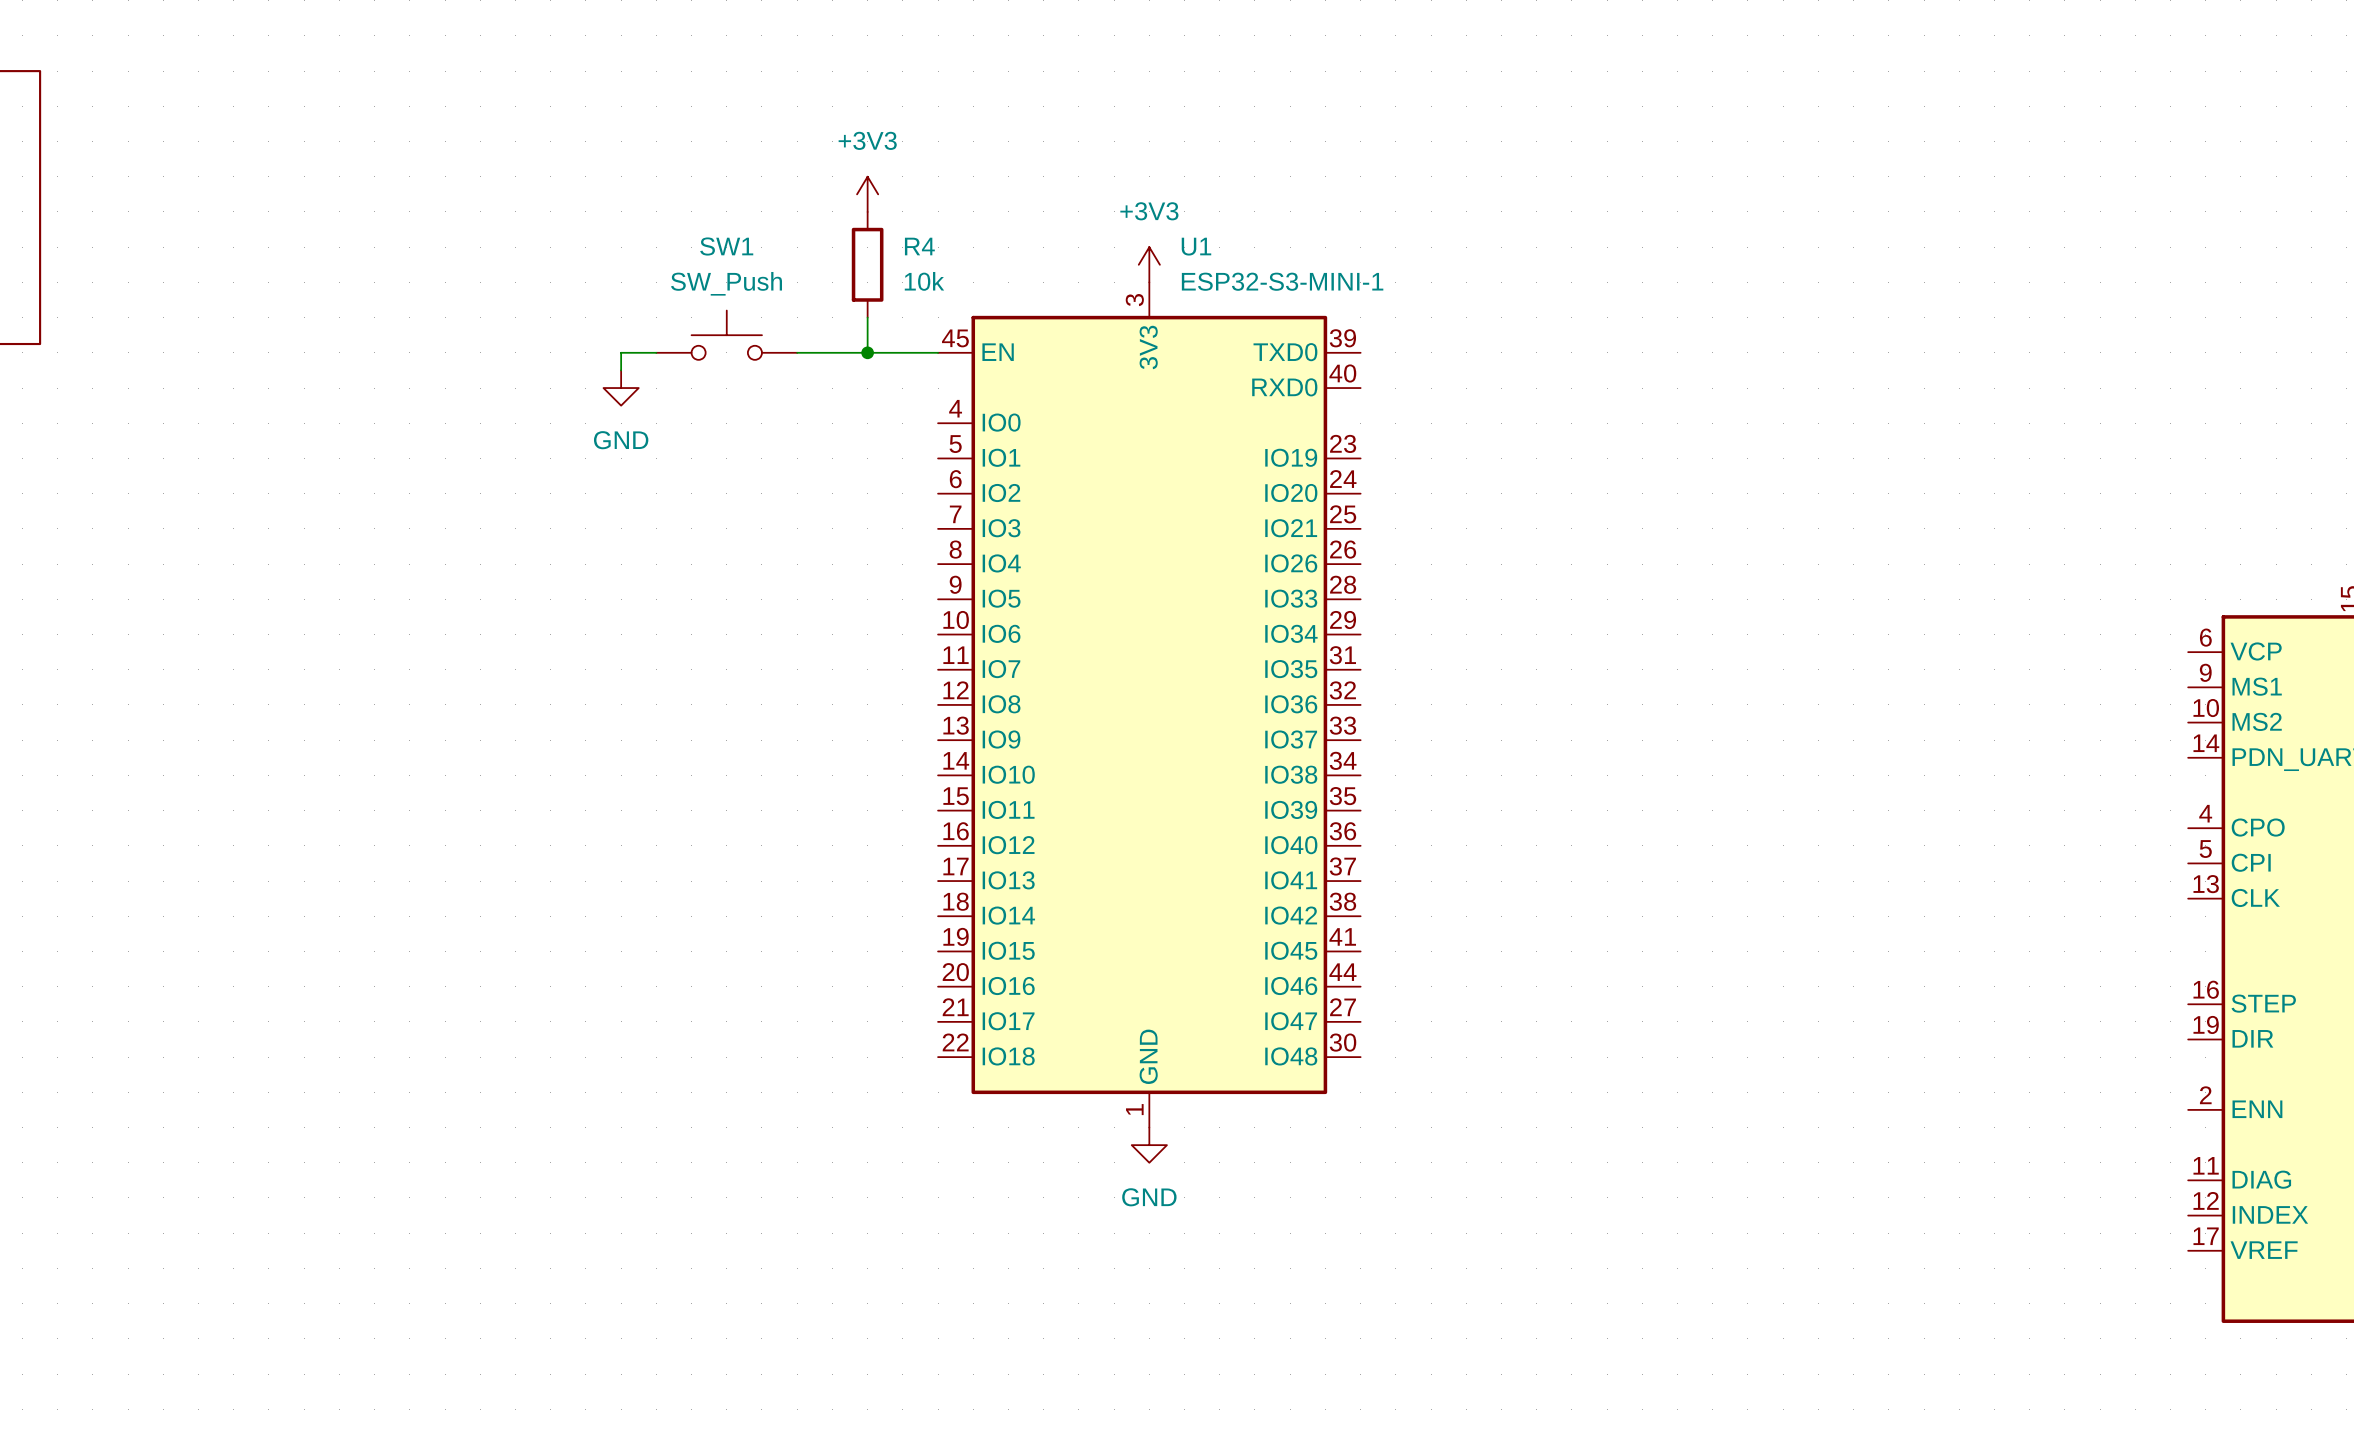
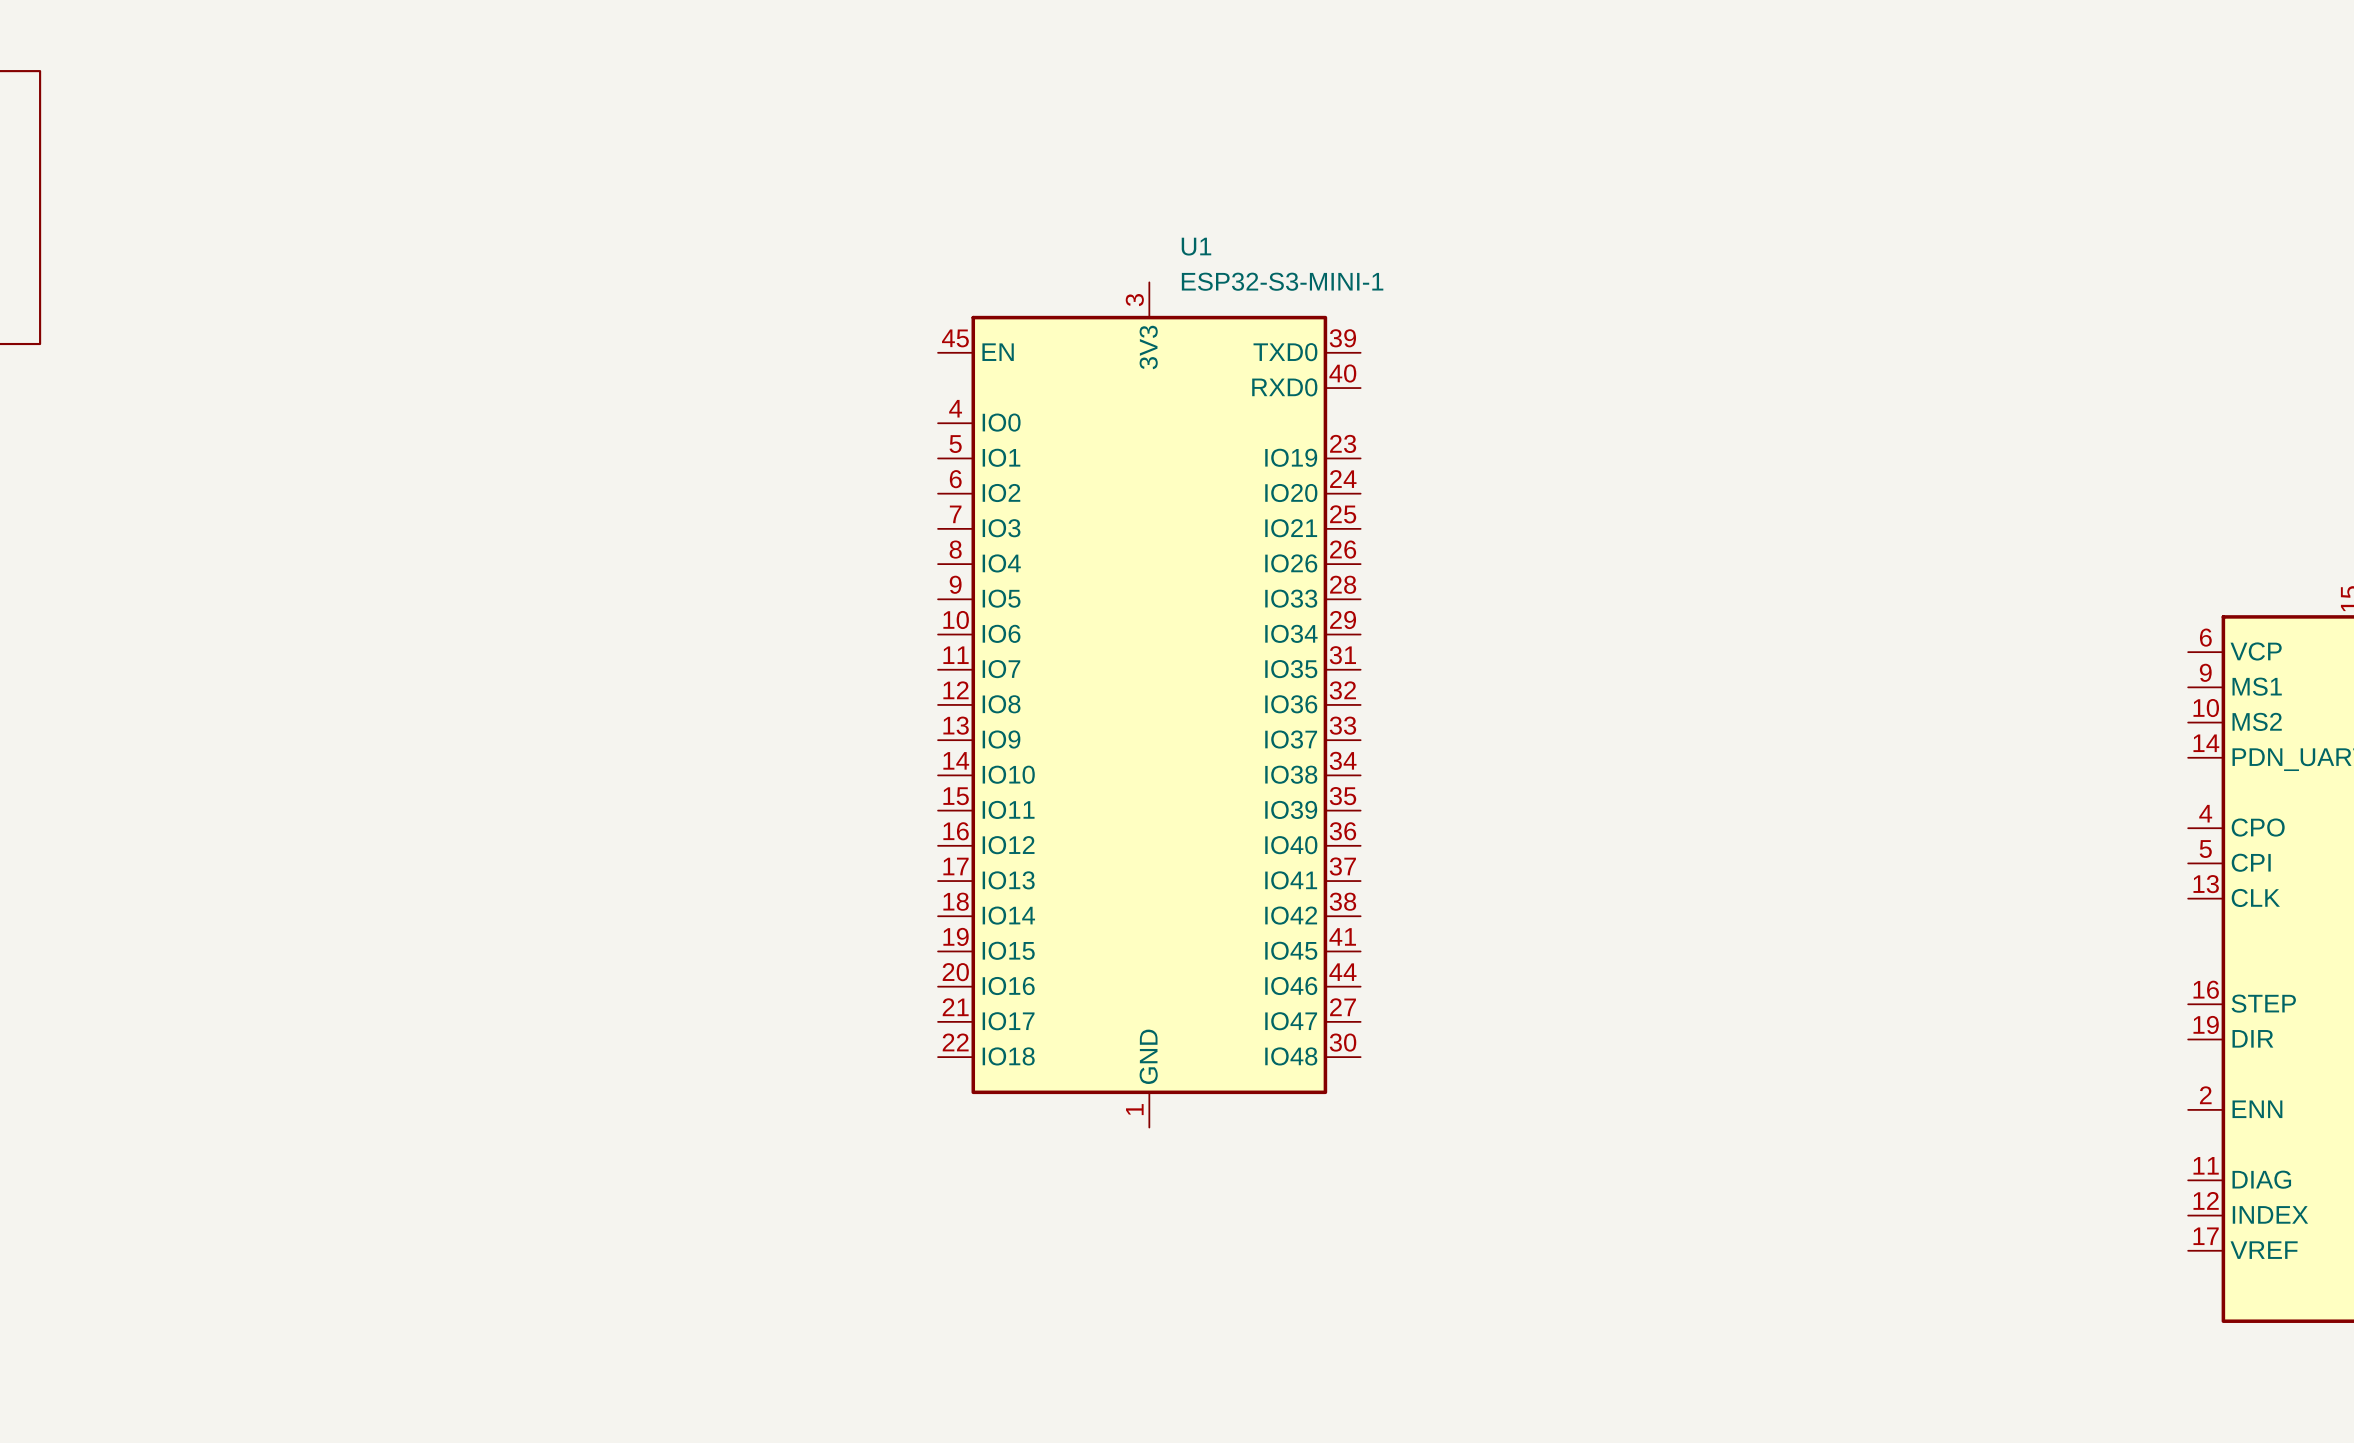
power symbol: +3V3 (867, 194) -> none
R4: 10k (867, 264) -> none
power symbol: +3V3 (1149, 264) -> none
wire: (867, 317) (867, 352) -> none
SW1: SW_Push (726, 335) -> none
wire: (656, 352) (621, 352) (621, 370) -> none
wire: (797, 352) (938, 352) -> none
junction: (867, 352) -> none
power symbol: GND (621, 388) -> none
power symbol: GND (1149, 1145) -> none

